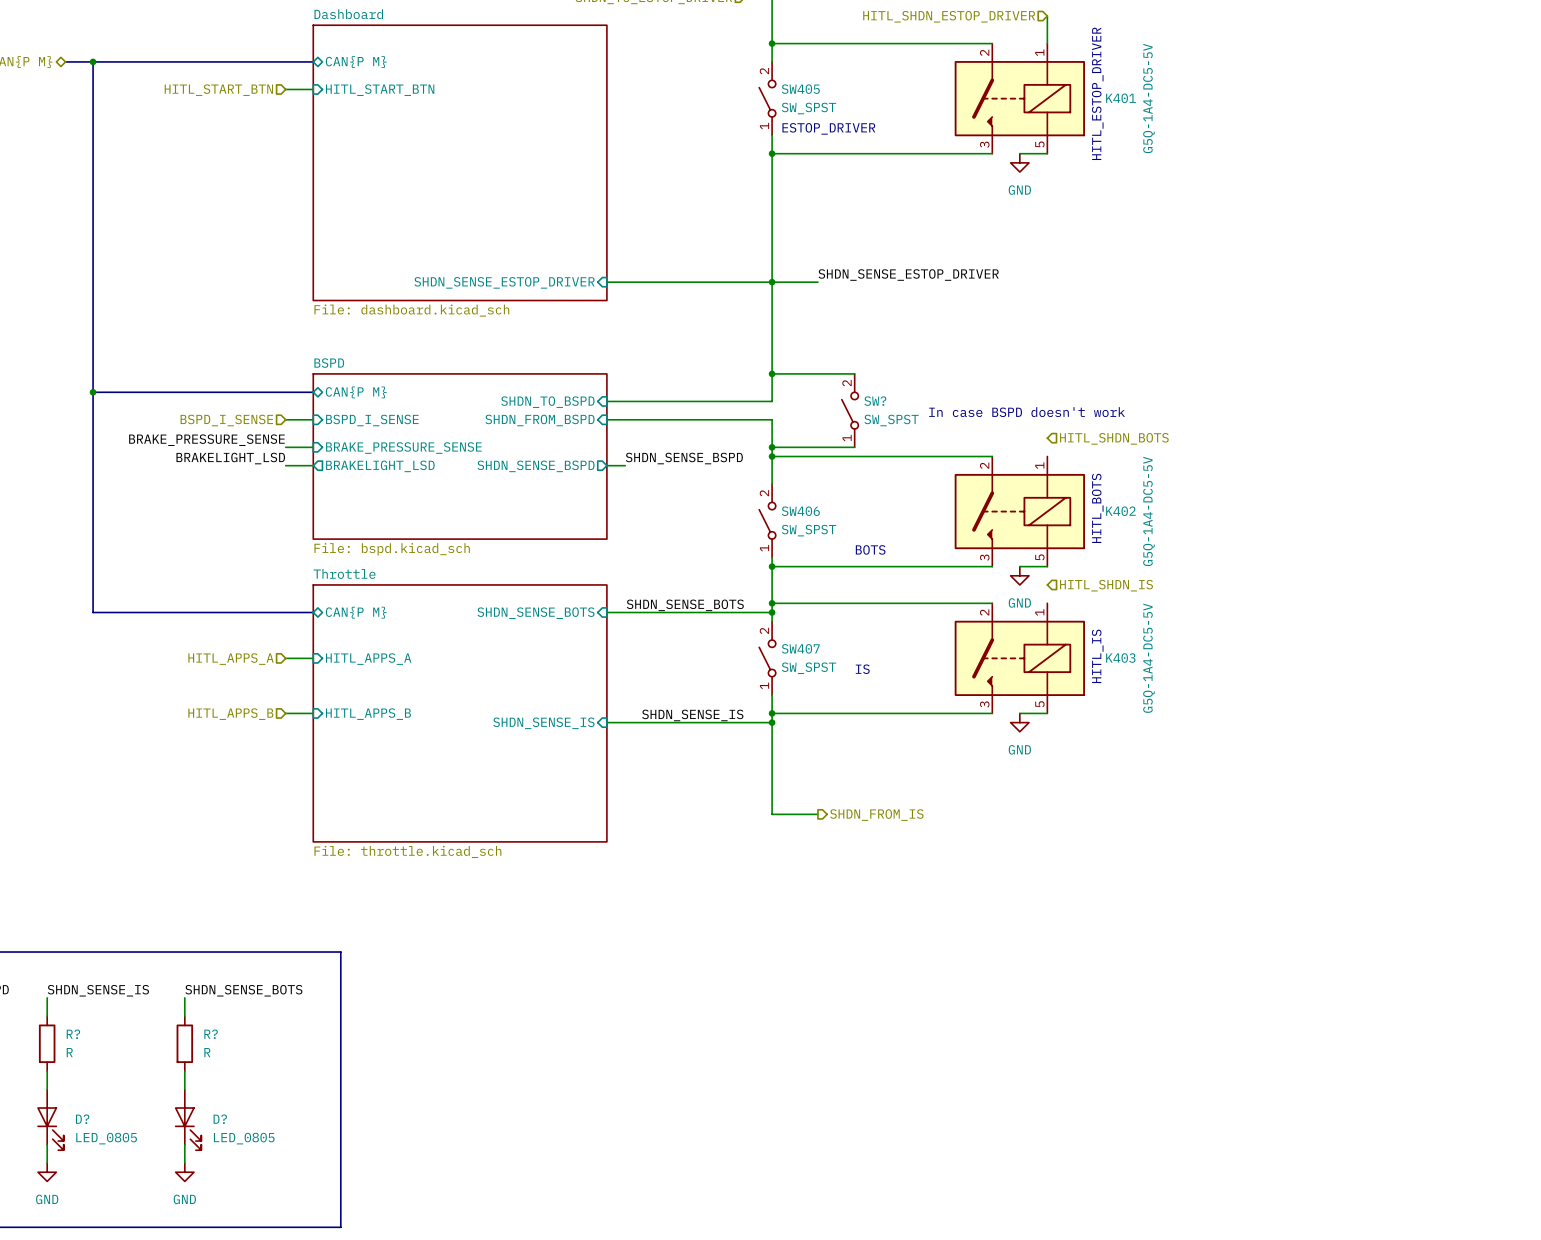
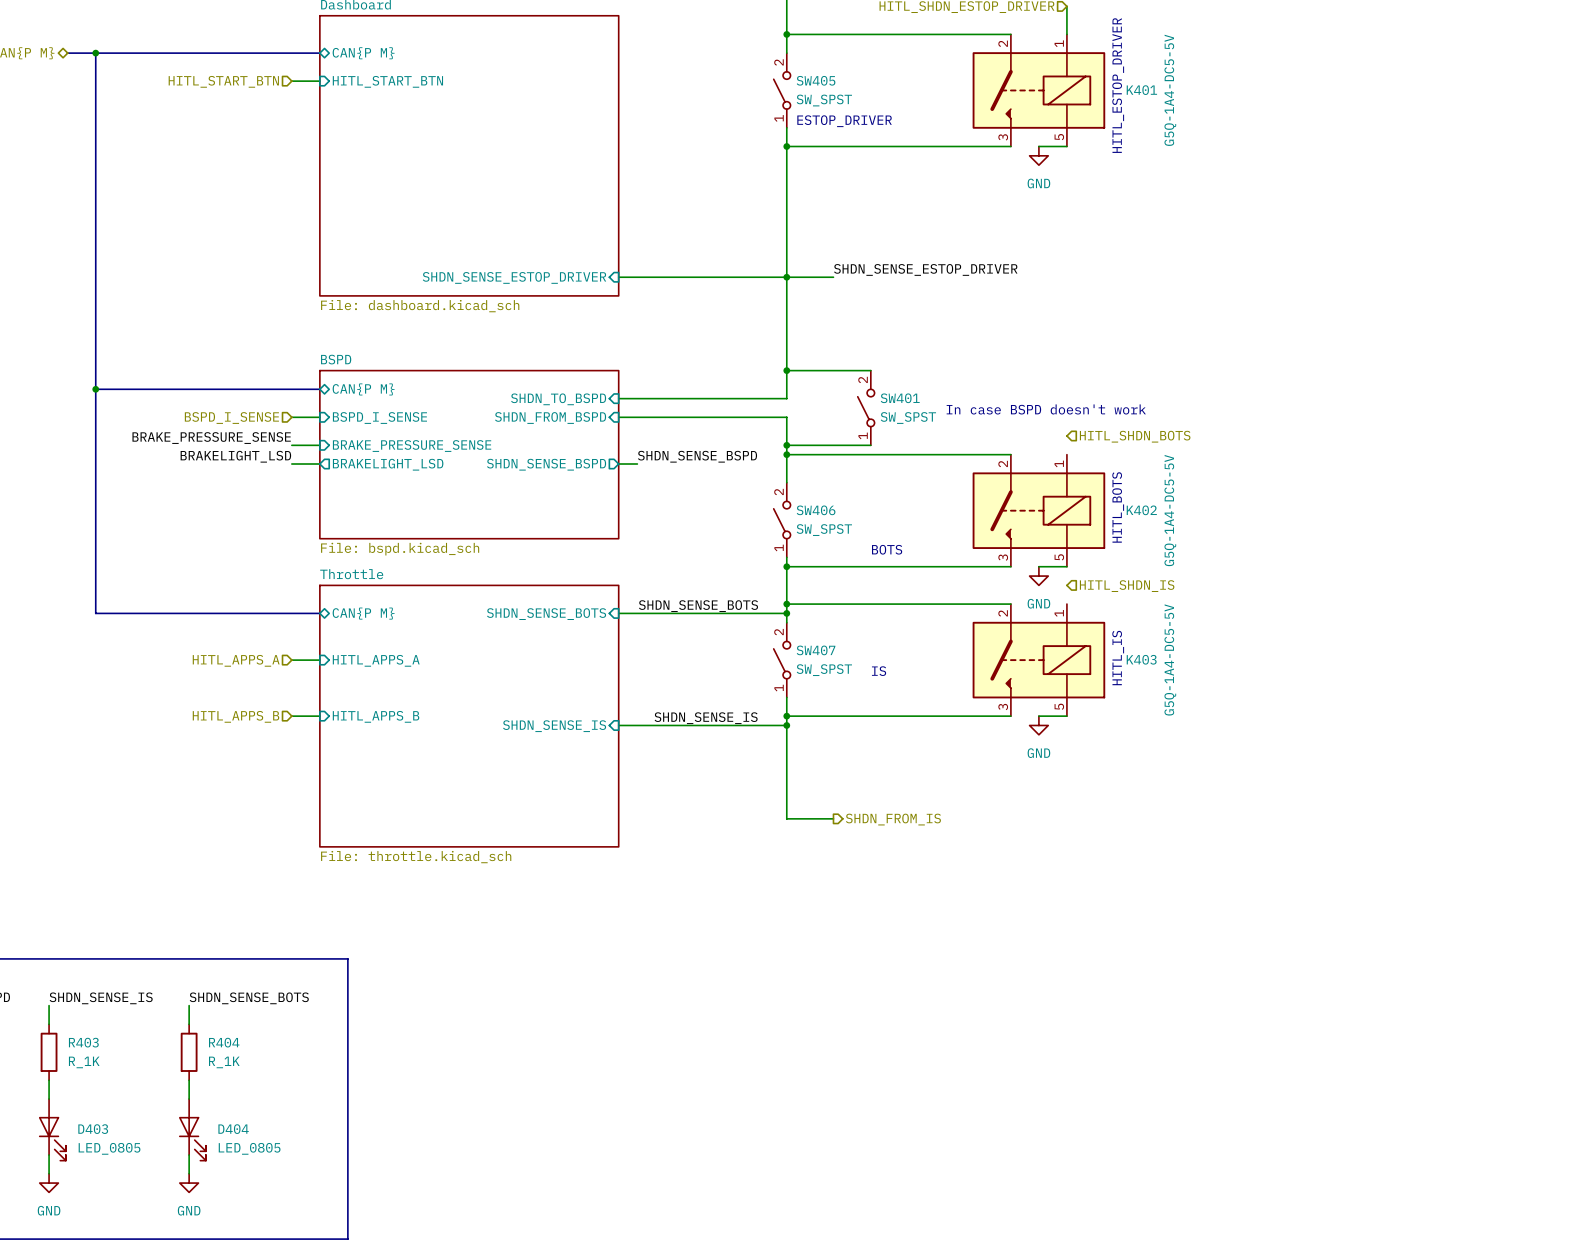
SW? name: SW? (875, 401) -> SW401 (900, 398)
R? name: R? (73, 1034) -> R403 (83, 1042)
R? name: R? (211, 1034) -> R404 (224, 1042)
R? value: R (69, 1052) -> R_1K (84, 1062)
R? value: R (207, 1052) -> R_1K (224, 1062)
D? name: D? (82, 1119) -> D403 (93, 1129)
D? name: D? (220, 1119) -> D404 (233, 1129)

